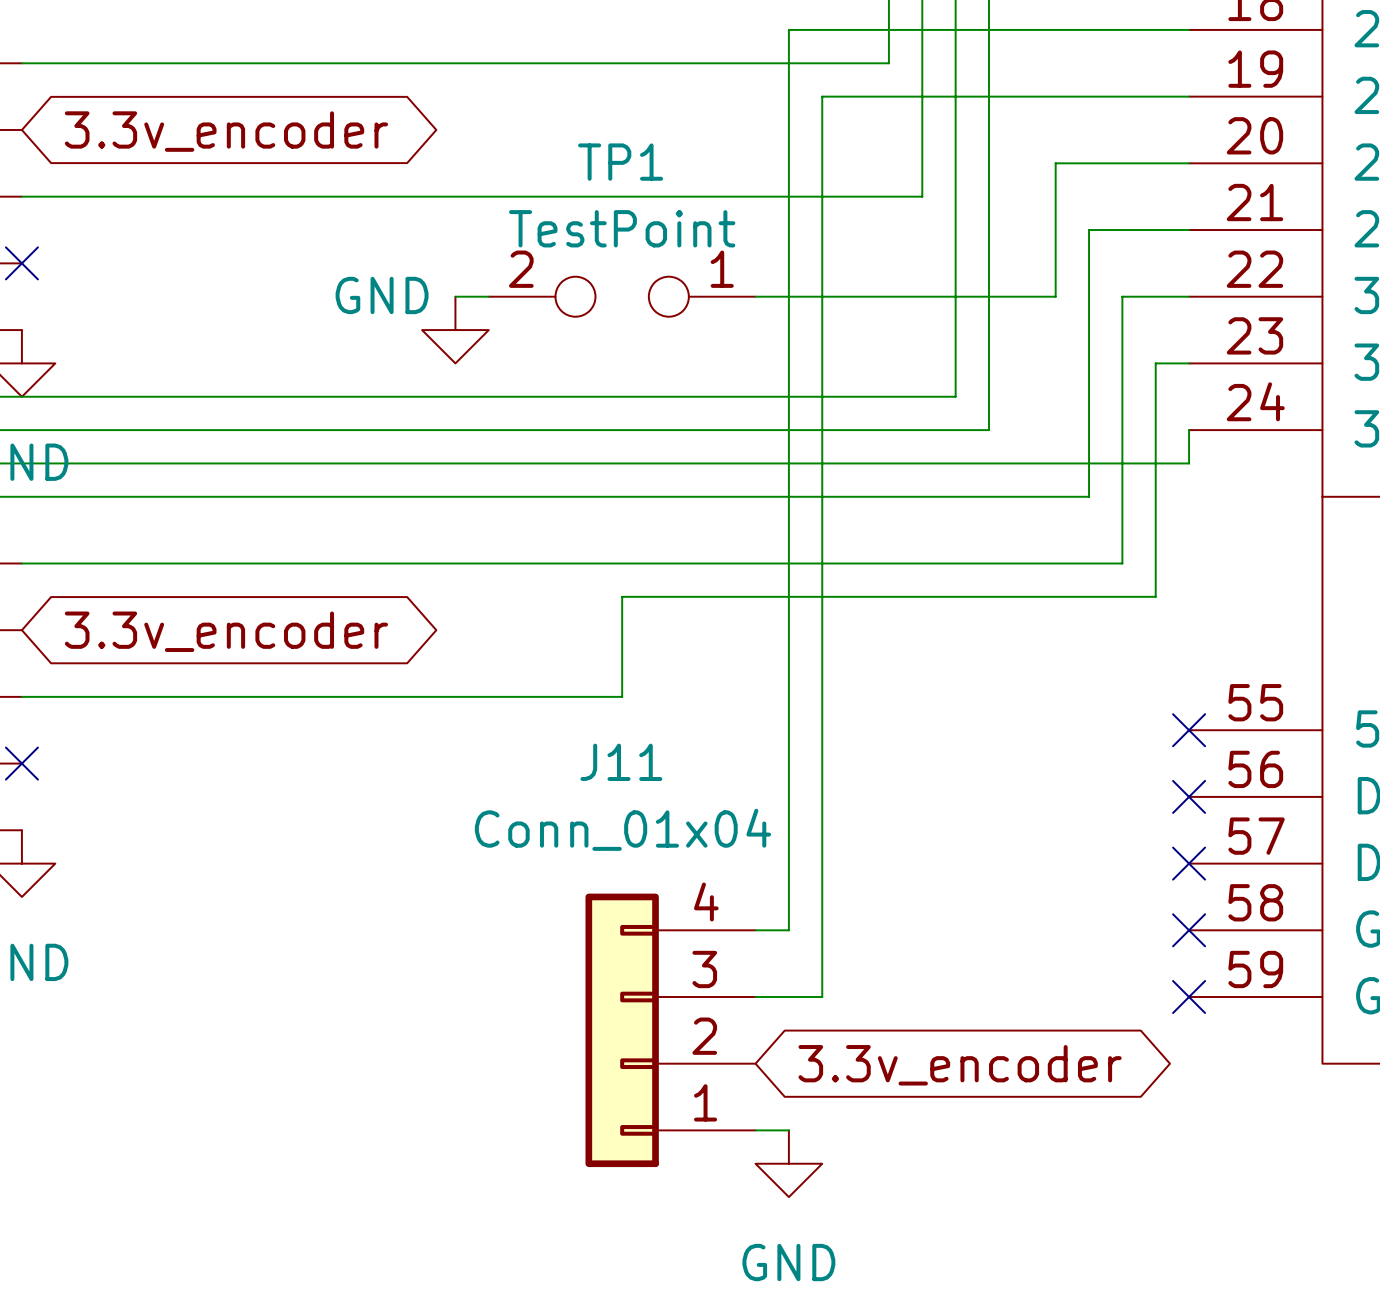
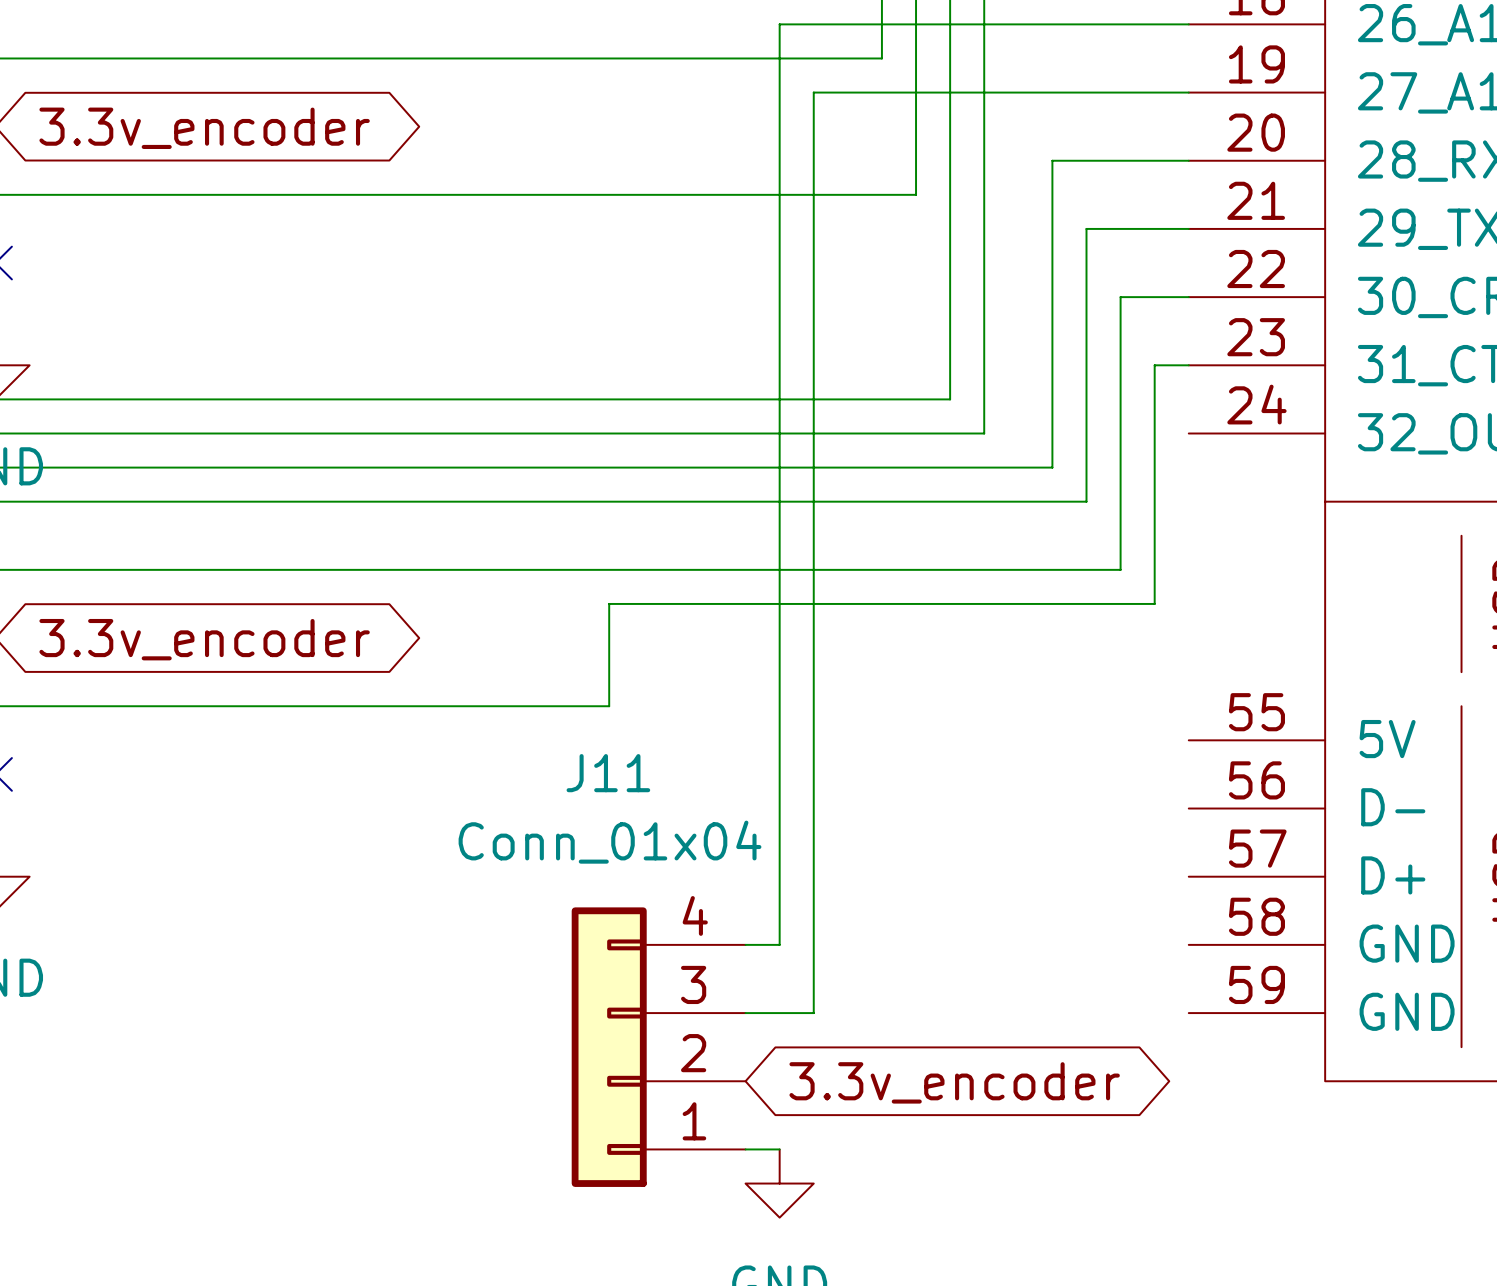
wire: (455, 296) (488, 296) -> none
TP1: TestPoint (622, 296) -> none
wire: (755, 296) (1055, 296) -> none
power symbol: GND (455, 330) -> none
wire: (1189, 430) (1189, 463) (1055, 463) -> (1052, 297) (1052, 467)
no-connect mark: (1189, 730) -> none
no-connect mark: (1189, 796) -> none
no-connect mark: (1189, 863) -> none
no-connect mark: (1189, 930) -> none
no-connect mark: (1189, 997) -> none

